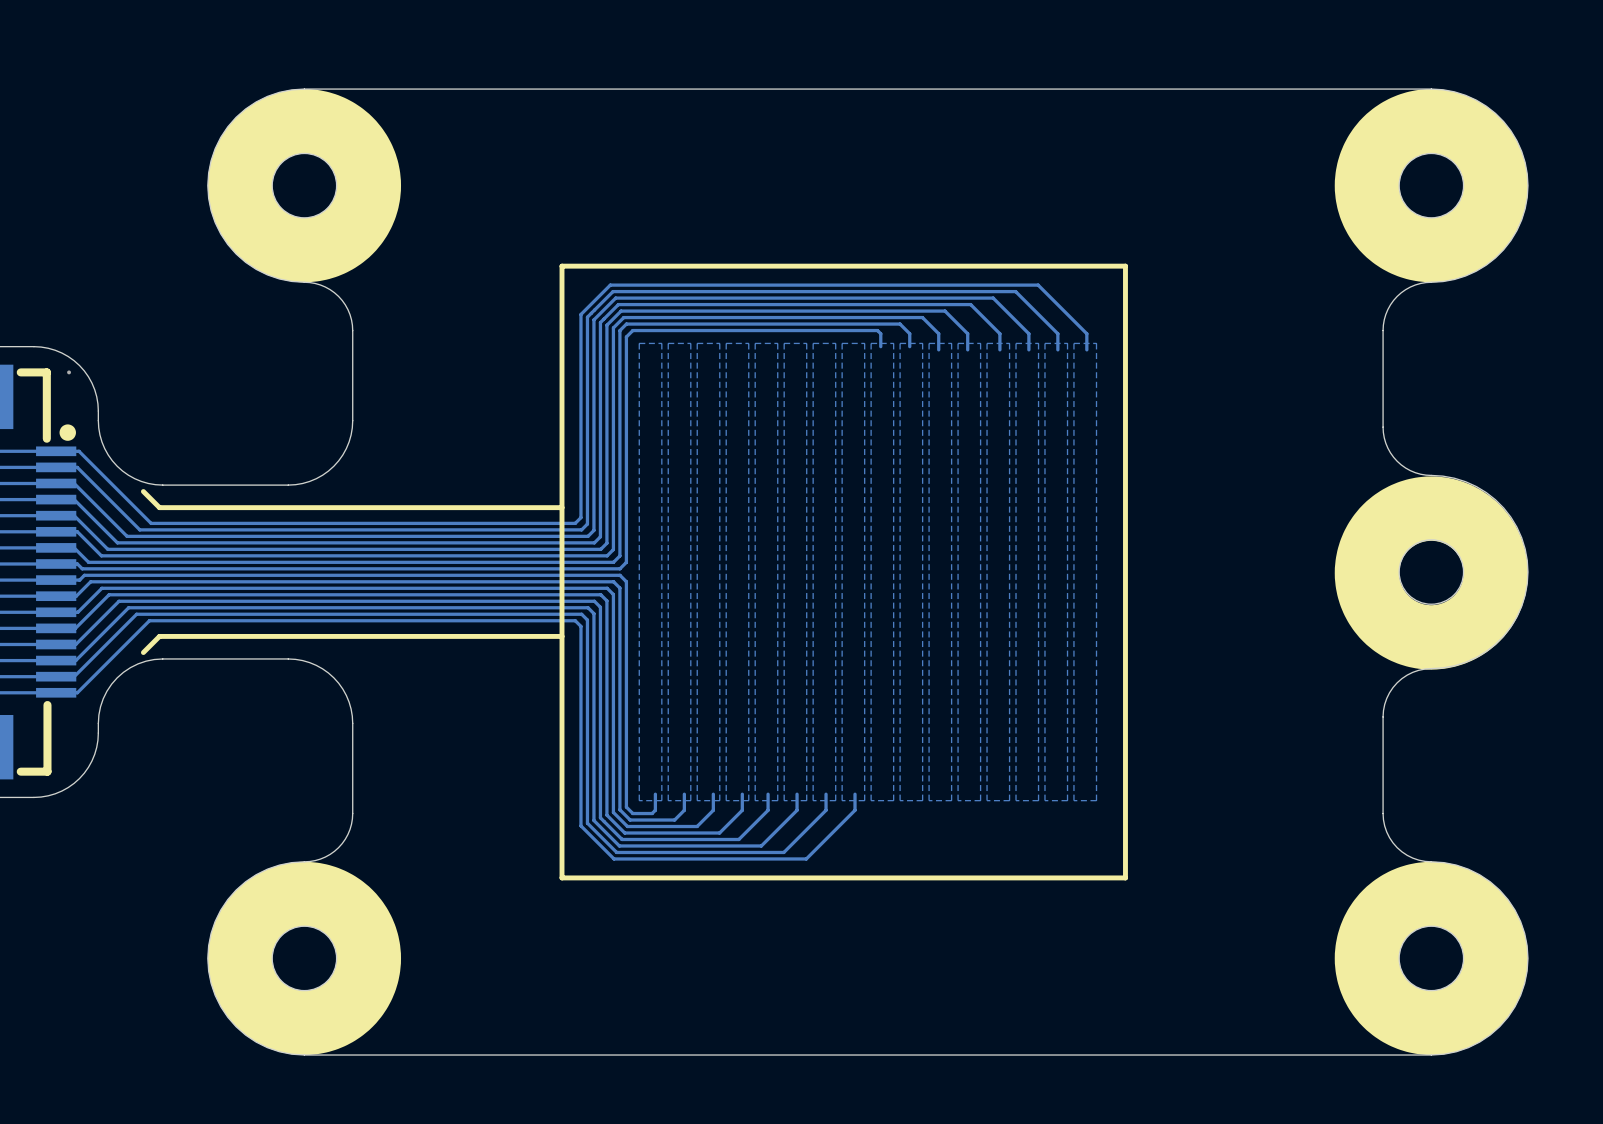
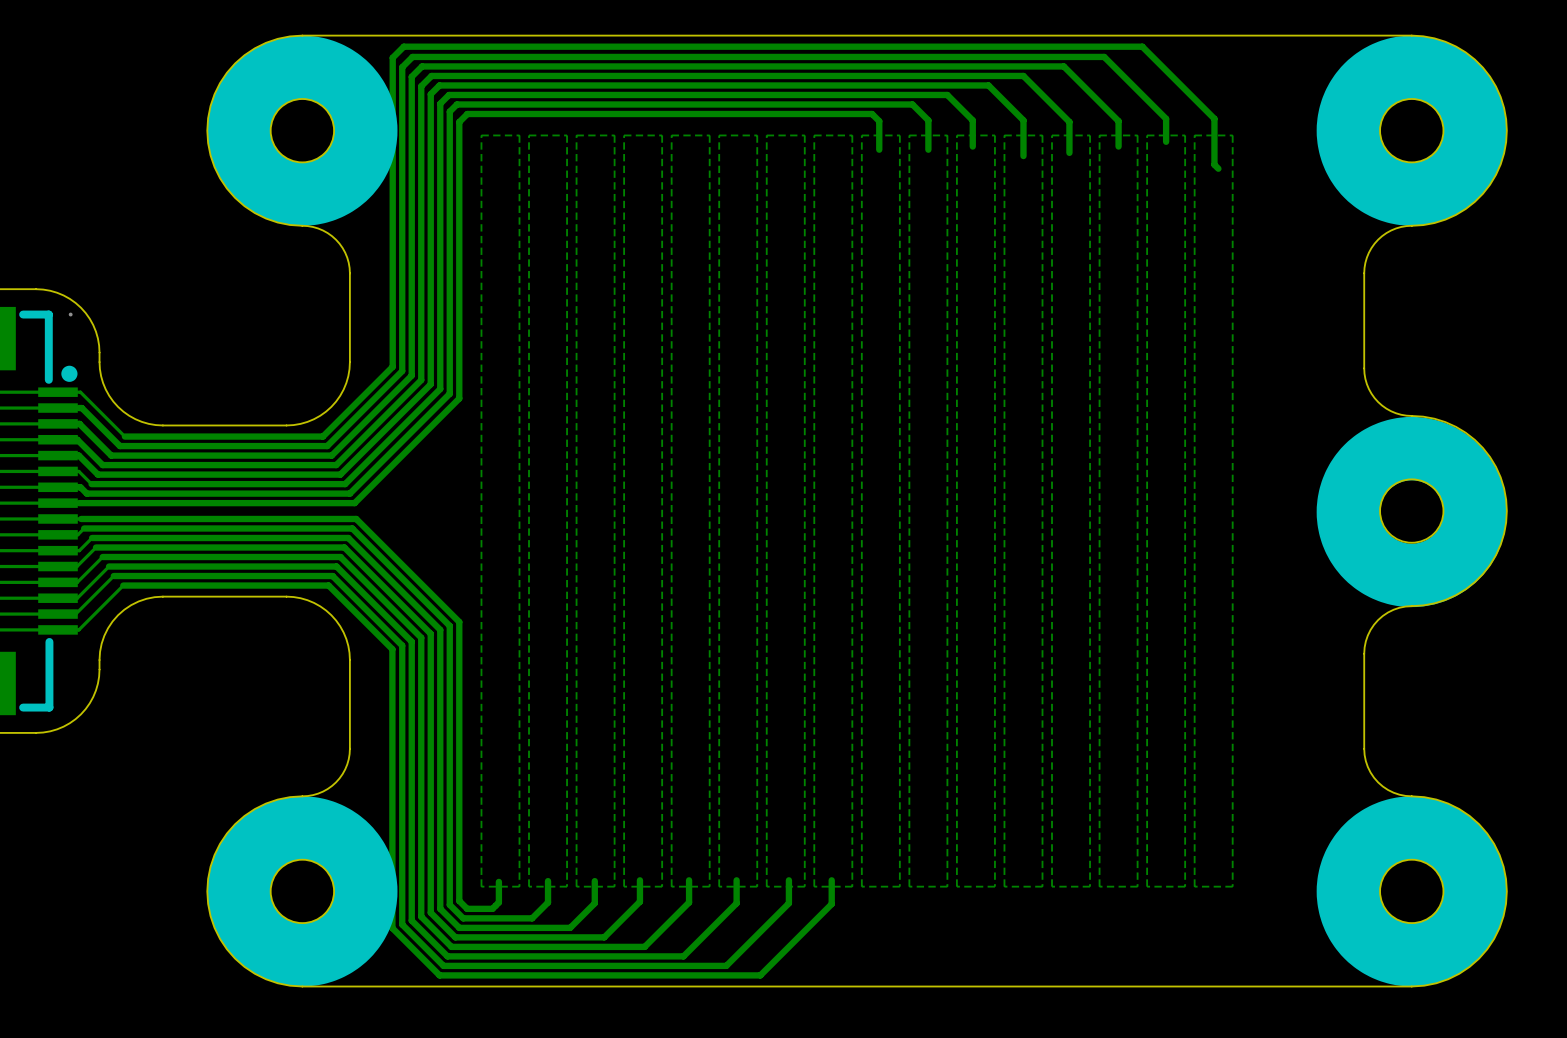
zone outline: none -> (519, 135) (481, 135) (481, 886) (519, 886) (519, 135)
zone outline: none -> (567, 135) (529, 135) (529, 886) (567, 886) (567, 135)
zone outline: none -> (614, 135) (576, 135) (576, 886) (614, 886) (614, 135)
zone outline: none -> (662, 135) (624, 135) (624, 886) (662, 886) (662, 135)
zone outline: none -> (709, 135) (671, 135) (671, 886) (709, 886) (709, 135)
zone outline: none -> (757, 135) (719, 135) (719, 886) (757, 886) (757, 135)
zone outline: none -> (804, 135) (766, 135) (766, 886) (804, 886) (804, 135)
zone outline: none -> (852, 135) (814, 135) (814, 886) (852, 886) (852, 135)
zone outline: none -> (899, 135) (861, 135) (861, 886) (899, 886) (899, 135)
zone outline: none -> (947, 135) (909, 135) (909, 886) (947, 886) (947, 135)
zone outline: none -> (994, 135) (956, 135) (956, 886) (994, 886) (994, 135)
zone outline: none -> (1042, 135) (1004, 135) (1004, 886) (1042, 886) (1042, 135)
zone outline: none -> (1090, 135) (1052, 135) (1052, 886) (1090, 886) (1090, 135)
zone outline: none -> (1137, 135) (1099, 135) (1099, 886) (1137, 886) (1137, 135)
zone outline: none -> (1185, 135) (1147, 135) (1147, 886) (1185, 886) (1185, 135)
zone outline: none -> (1232, 135) (1194, 135) (1194, 886) (1232, 886) (1232, 135)
line: (1125, 266) (562, 266) (562, 877) (1125, 877) (1125, 266) -> none
zone outline: (661, 343) (639, 343) (639, 800) (661, 800) (661, 343) -> none
zone outline: (690, 343) (668, 343) (668, 800) (690, 800) (690, 343) -> none
zone outline: (719, 343) (697, 343) (697, 800) (719, 800) (719, 343) -> none
zone outline: (748, 343) (726, 343) (726, 800) (748, 800) (748, 343) -> none
zone outline: (777, 343) (755, 343) (755, 800) (777, 800) (777, 343) -> none
zone outline: (806, 343) (784, 343) (784, 800) (806, 800) (806, 343) -> none
zone outline: (835, 343) (813, 343) (813, 800) (835, 800) (835, 343) -> none
zone outline: (864, 343) (842, 343) (842, 800) (864, 800) (864, 343) -> none
zone outline: (893, 343) (871, 343) (871, 800) (893, 800) (893, 343) -> none
zone outline: (922, 343) (900, 343) (900, 800) (922, 800) (922, 343) -> none
zone outline: (951, 343) (929, 343) (929, 800) (951, 800) (951, 343) -> none
zone outline: (980, 343) (958, 343) (958, 800) (980, 800) (980, 343) -> none
zone outline: (1009, 343) (987, 343) (987, 800) (1009, 800) (1009, 343) -> none
zone outline: (1038, 343) (1016, 343) (1016, 800) (1038, 800) (1038, 343) -> none
zone outline: (1067, 343) (1044, 343) (1044, 800) (1067, 800) (1067, 343) -> none
zone outline: (1096, 343) (1073, 343) (1073, 800) (1096, 800) (1096, 343) -> none
track: (880, 346) (880, 333) (877, 330) (632, 330) (626, 336) (626, 562) (619, 568) (82, 568) (77, 563) -> (879, 149) (879, 121) (872, 114) (467, 114) (459, 122) (459, 398) (354, 503) (78, 503)
track: (909, 346) (909, 333) (900, 324) (626, 324) (619, 330) (619, 555) (613, 562) (88, 562) (74, 547) -> (928, 149) (928, 120) (912, 104) (456, 104) (449, 111) (449, 393) (349, 493) (86, 493) (80, 487) (75, 487)
track: (938, 349) (938, 333) (922, 317) (623, 317) (613, 327) (613, 549) (607, 555) (101, 555) (90, 544) -> (972, 146) (972, 120) (947, 94) (449, 94) (440, 103) (440, 389) (345, 484) (91, 484)
track: (967, 349) (967, 333) (945, 311) (621, 311) (606, 325) (606, 543) (600, 549) (107, 549) (74, 515) -> (1023, 156) (1023, 120) (988, 85) (439, 85) (430, 94) (430, 384) (340, 474) (97, 474) (78, 455) (75, 455)
track: (999, 349) (999, 333) (970, 304) (618, 304) (600, 322) (600, 536) (594, 542) (117, 542) (74, 499) -> (1069, 152) (1069, 121) (1023, 75) (431, 75) (421, 86) (421, 380) (336, 465) (102, 465) (75, 439)
track: (1028, 349) (1028, 333) (993, 298) (615, 298) (593, 319) (593, 530) (588, 536) (127, 536) (74, 483) -> (1118, 146) (1118, 121) (1063, 66) (422, 66) (411, 76) (411, 375) (331, 455) (111, 455) (79, 423) (75, 423)
track: (1057, 349) (1057, 333) (1015, 291) (613, 291) (587, 317) (587, 524) (581, 529) (139, 529) (77, 467) -> (1166, 141) (1166, 118) (1104, 56) (412, 56) (402, 67) (402, 371) (327, 446) (119, 446) (81, 408) (78, 408)
track: (1086, 349) (1086, 333) (1038, 285) (610, 285) (580, 314) (580, 517) (575, 523) (151, 523) (124, 496) -> (1218, 168) (1214, 164) (1214, 118) (1142, 46) (403, 46) (392, 57) (392, 366) (322, 436) (124, 436)
line: (143, 491) (159, 507) (562, 507) -> none
track: (79, 580) (84, 575) (620, 575) (626, 581) (626, 807) (632, 813) (652, 813) (655, 810) (655, 794) -> (81, 518) (356, 518) (459, 621) (459, 900) (467, 908) (492, 908) (498, 902) (498, 881)
track: (82, 589) (90, 581) (613, 581) (619, 588) (619, 809) (630, 820) (674, 820) (684, 810) (684, 794) -> (84, 528) (352, 528) (449, 625) (449, 904) (463, 918) (532, 918) (548, 902) (548, 881)
track: (90, 599) (101, 588) (607, 588) (613, 594) (613, 812) (627, 826) (697, 826) (713, 810) (713, 794) -> (92, 537) (348, 537) (440, 629) (440, 908) (459, 927) (570, 927) (594, 903) (594, 881)
track: (94, 609) (109, 594) (600, 594) (606, 600) (606, 815) (624, 833) (719, 833) (742, 810) (742, 794) -> (96, 547) (344, 547) (430, 633) (430, 912) (455, 937) (604, 937) (639, 901) (639, 880)
track: (101, 618) (119, 601) (594, 601) (600, 607) (600, 817) (622, 839) (738, 839) (768, 810) (768, 794) -> (102, 557) (340, 557) (421, 637) (421, 916) (451, 946) (644, 946) (689, 902) (689, 880)
track: (108, 628) (128, 607) (588, 607) (593, 613) (593, 820) (619, 845) (761, 845) (797, 810) (797, 794) -> (109, 566) (336, 566) (411, 641) (411, 920) (447, 956) (683, 956) (736, 903) (736, 880)
line: (562, 636) (159, 636) (143, 652) -> none
track: (112, 638) (136, 614) (581, 614) (587, 620) (587, 823) (616, 852) (783, 852) (826, 810) (826, 794) -> (113, 576) (332, 576) (402, 645) (402, 924) (443, 965) (726, 965) (788, 903) (788, 880)
track: (122, 647) (149, 620) (575, 620) (580, 626) (580, 825) (614, 858) (806, 858) (855, 810) (855, 794) -> (123, 585) (328, 585) (392, 649) (392, 928) (439, 975) (760, 975) (831, 904) (831, 880)

